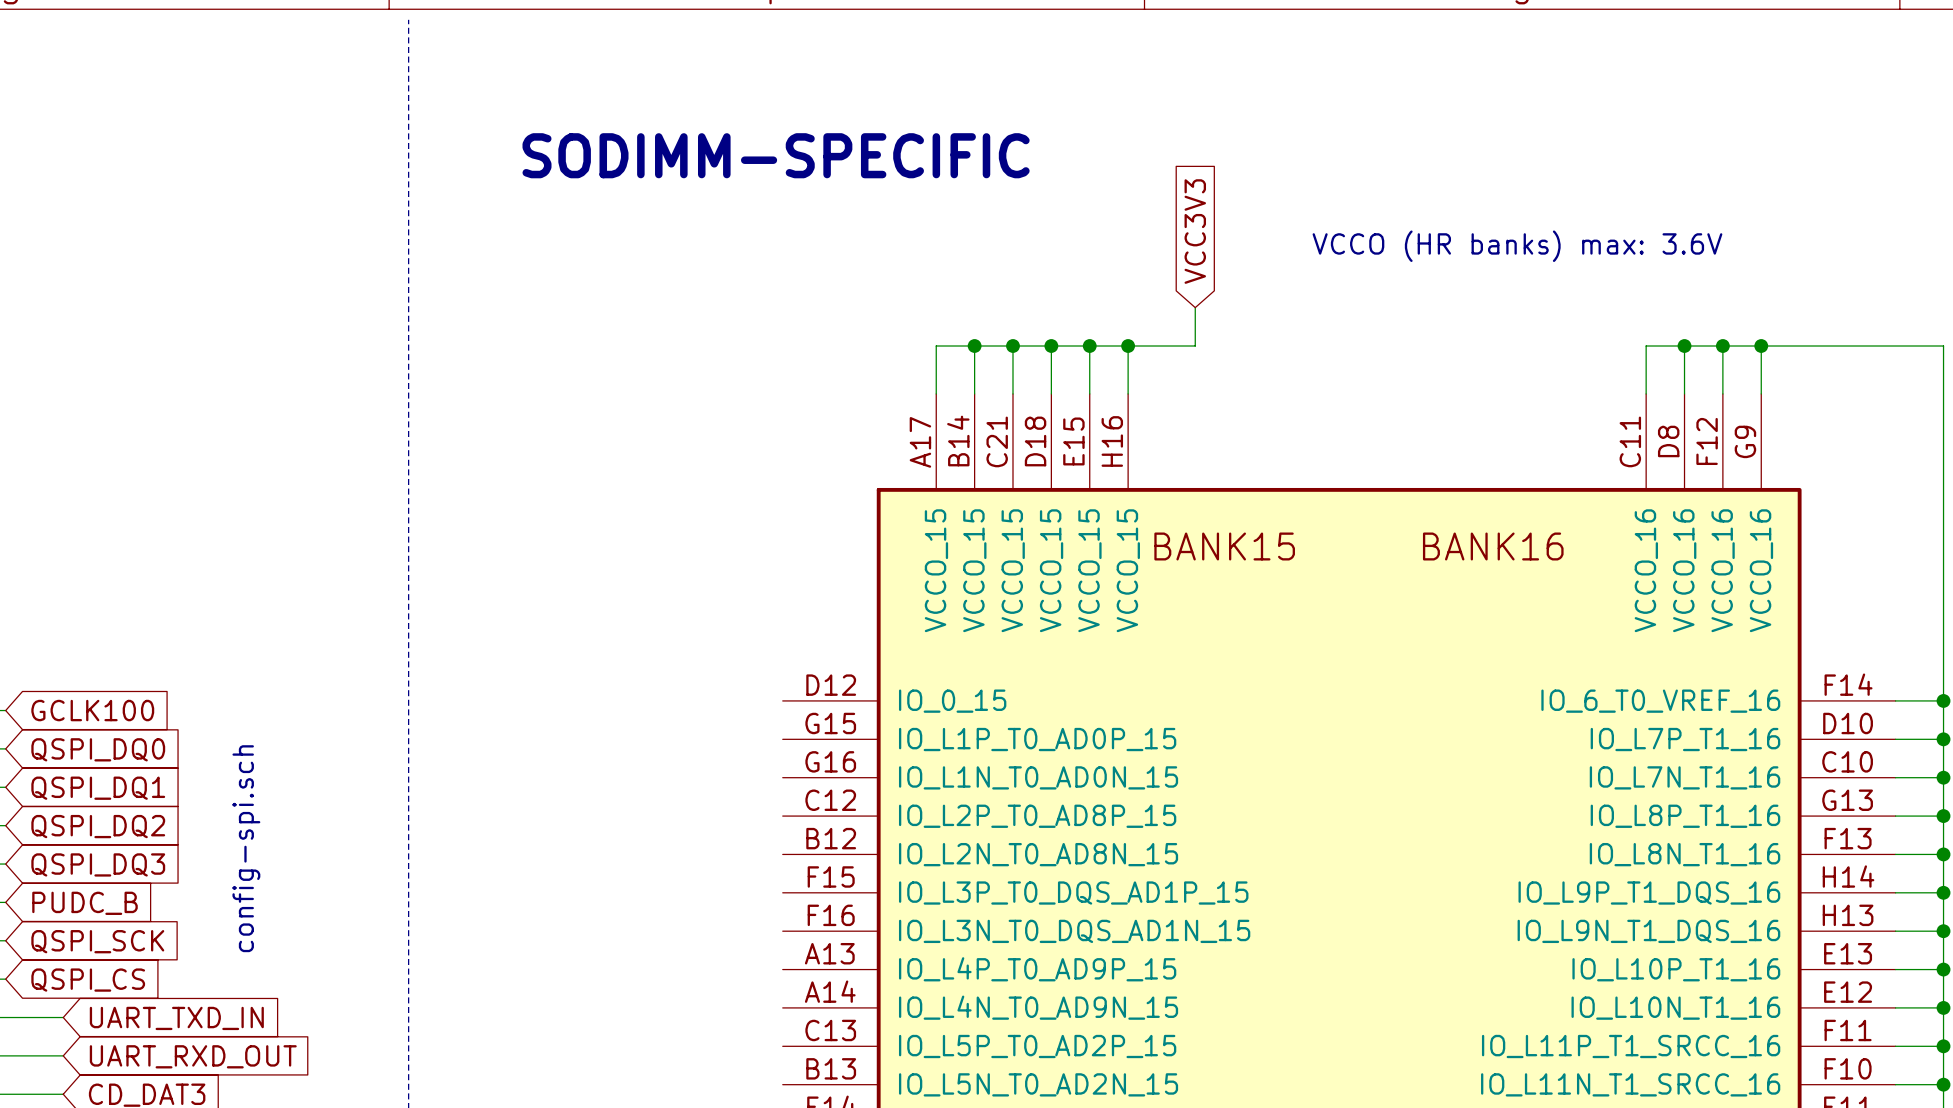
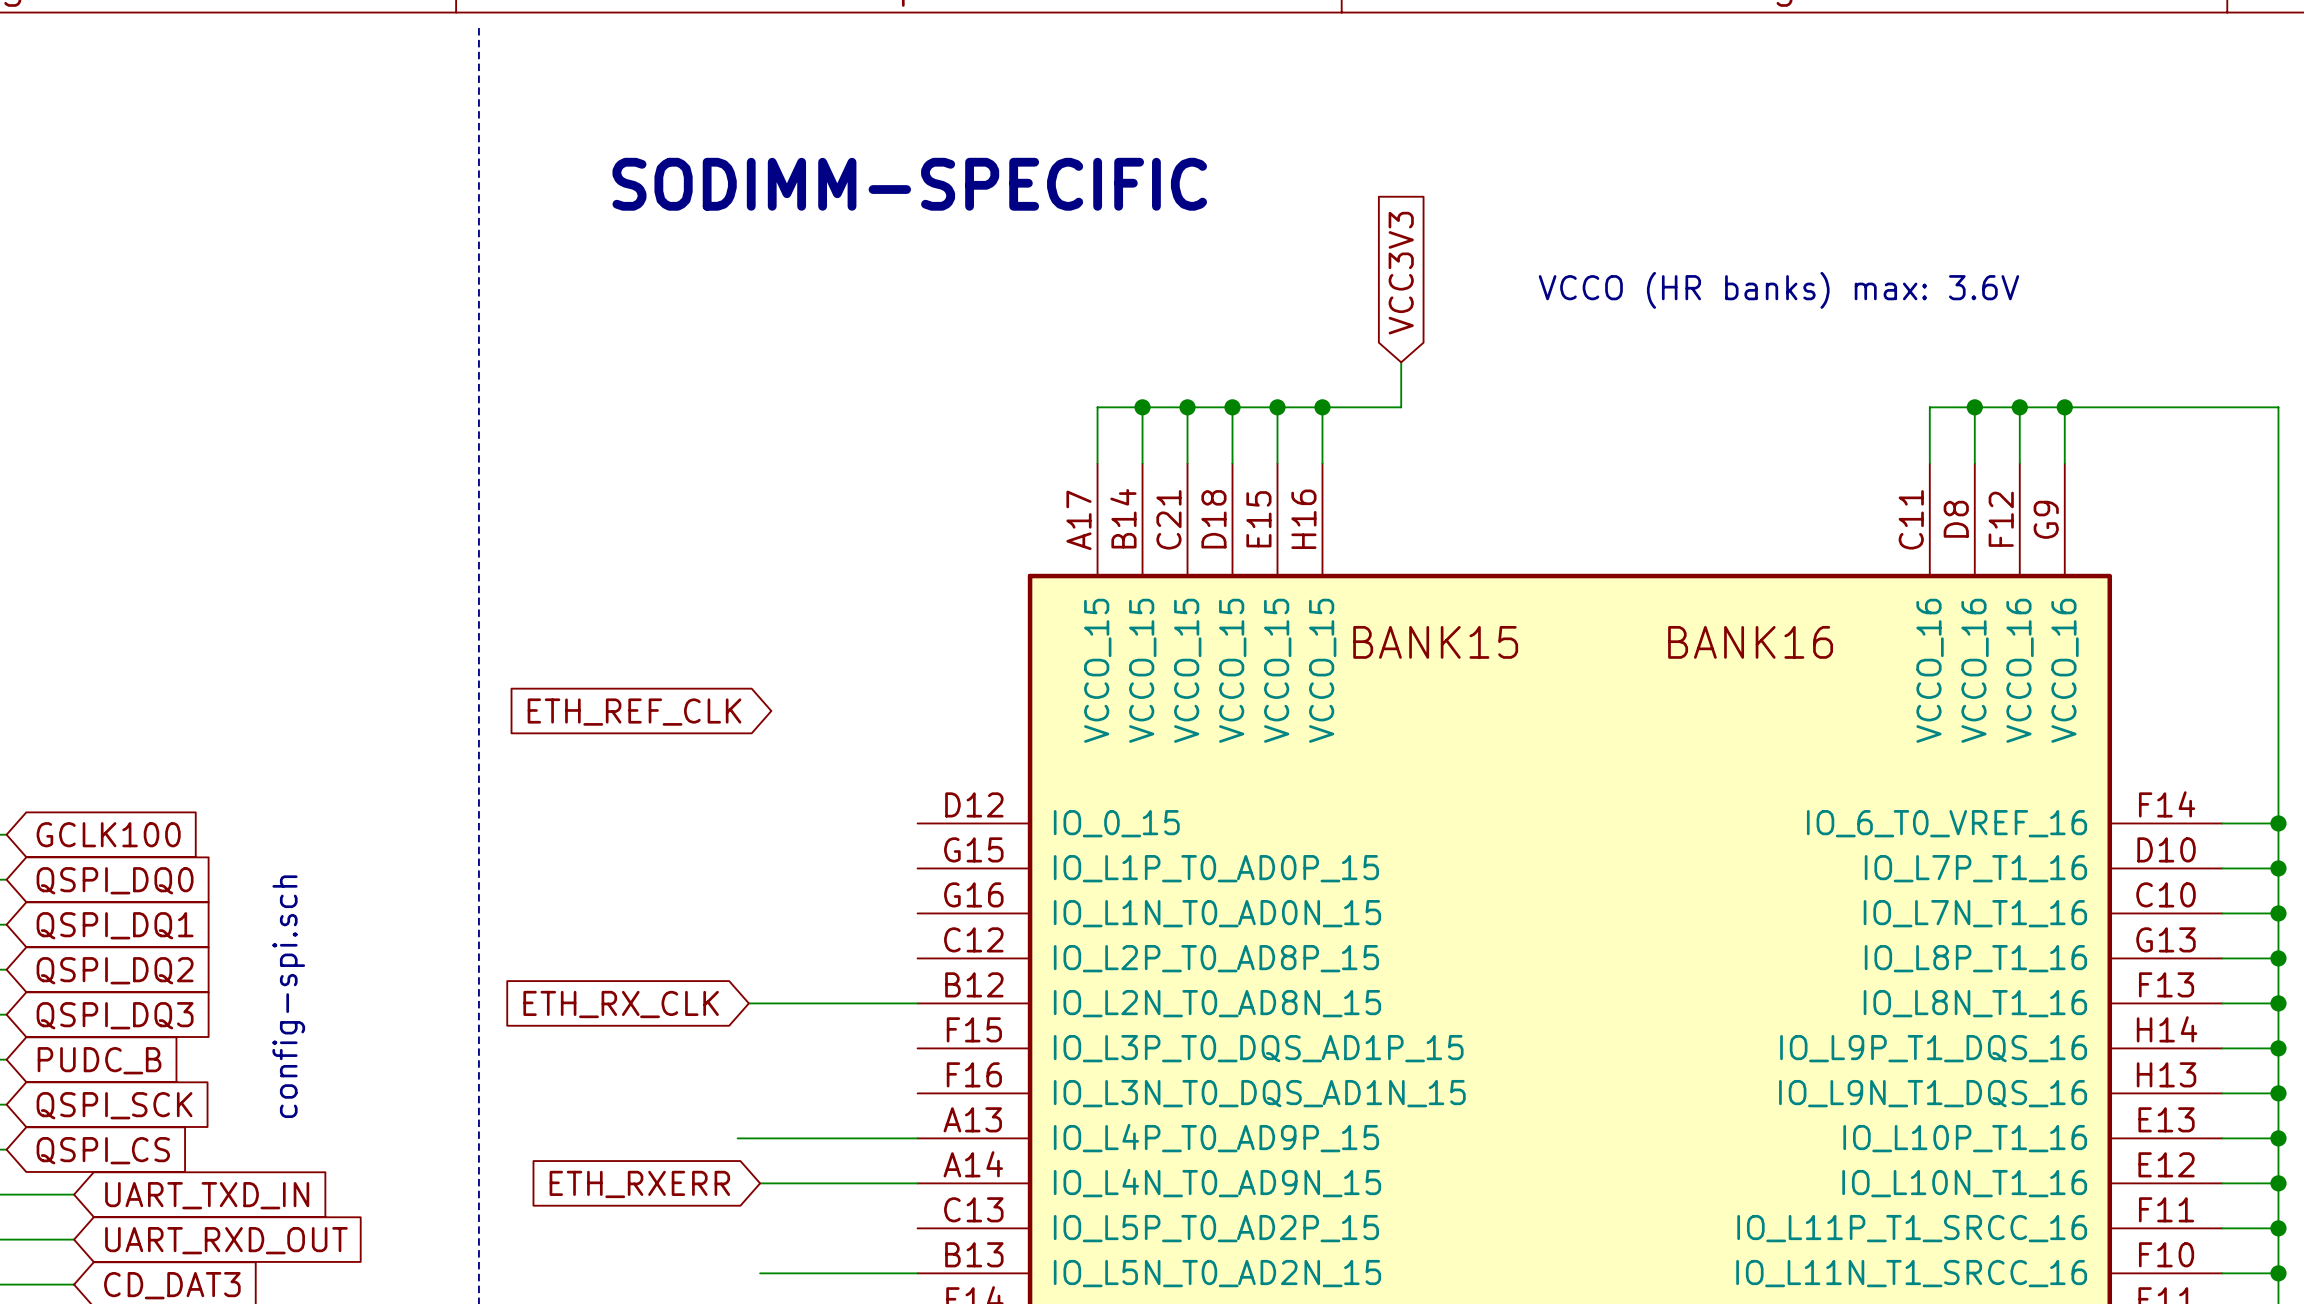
global label: none -> ETH_REF_CLK (634, 712)
wire: none -> (748, 1003) (917, 1003)
global label: none -> ETH_RX_CLK (621, 1004)
wire: none -> (737, 1138) (917, 1138)
wire: none -> (760, 1183) (917, 1183)
global label: none -> ETH_RXERR (639, 1184)
wire: none -> (760, 1273) (917, 1273)

